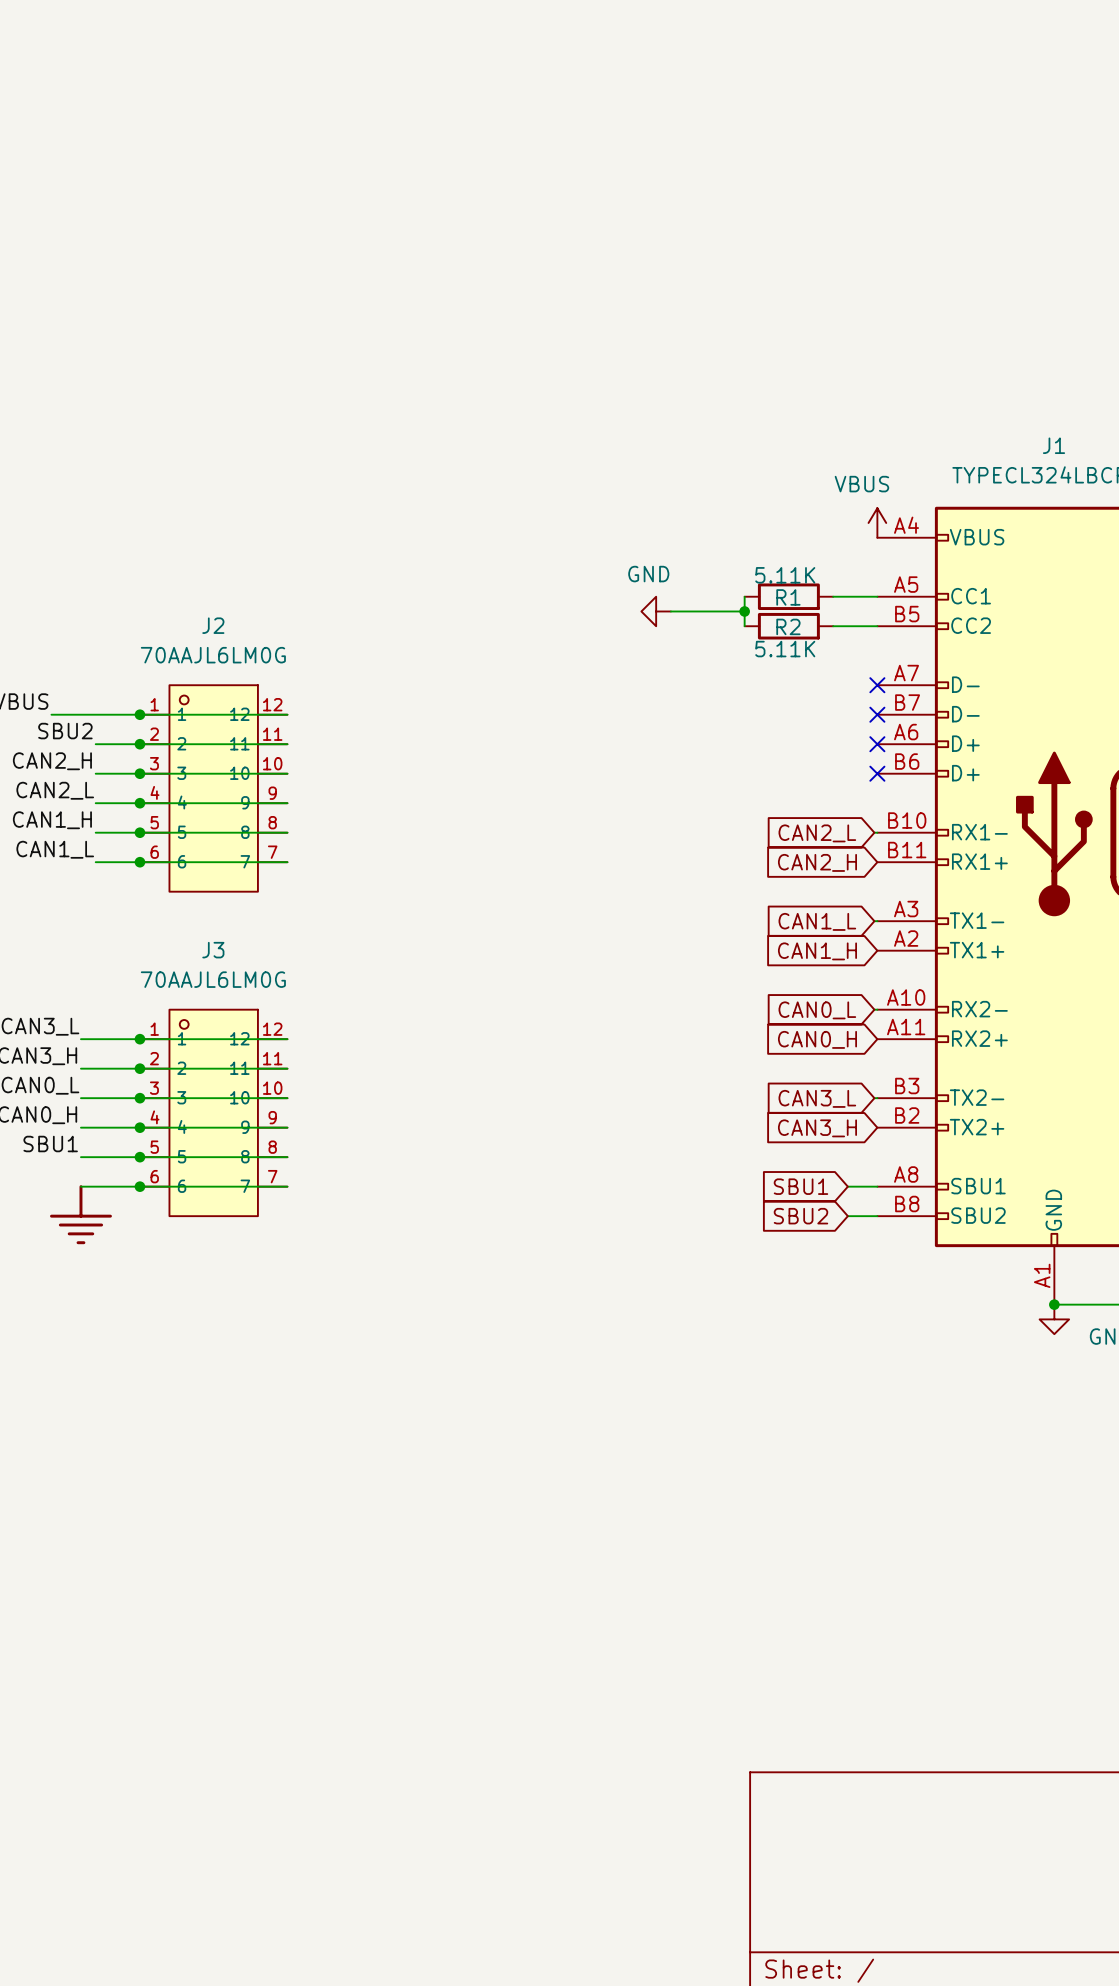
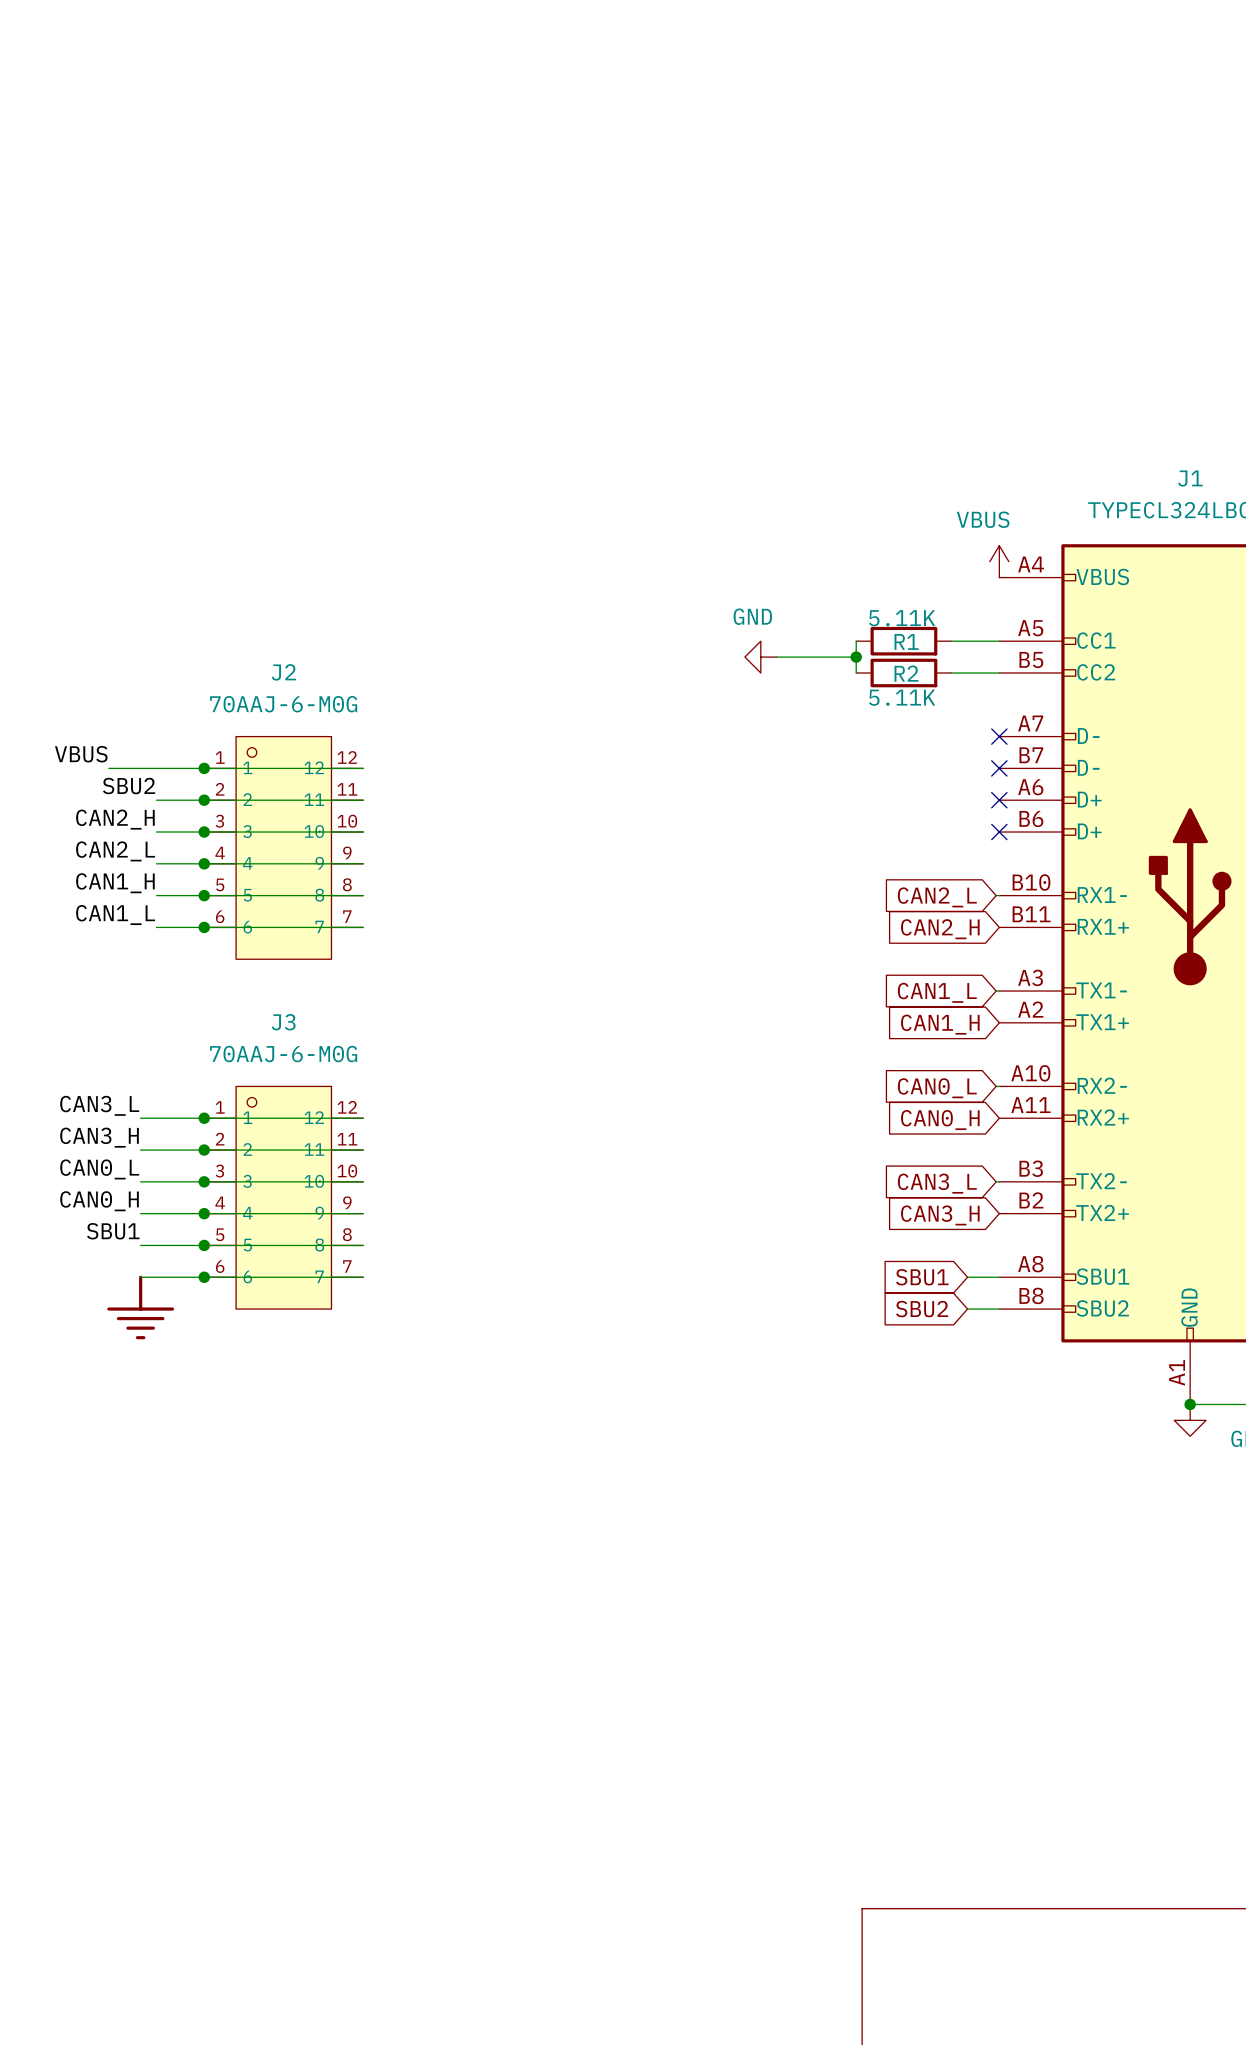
J2 value: 70AAJL6LM0G (213, 655) -> 70AAJ-6-M0G (283, 704)
J3 value: 70AAJL6LM0G (213, 979) -> 70AAJ-6-M0G (283, 1054)

